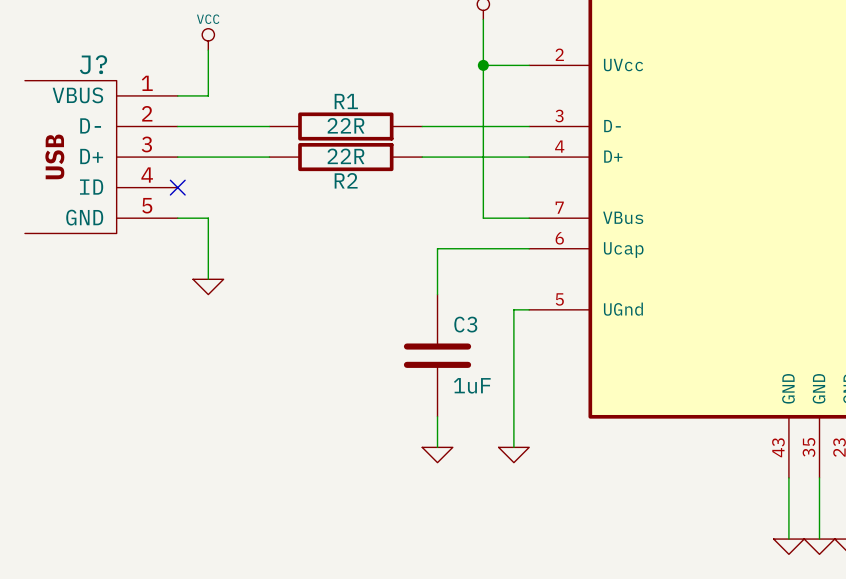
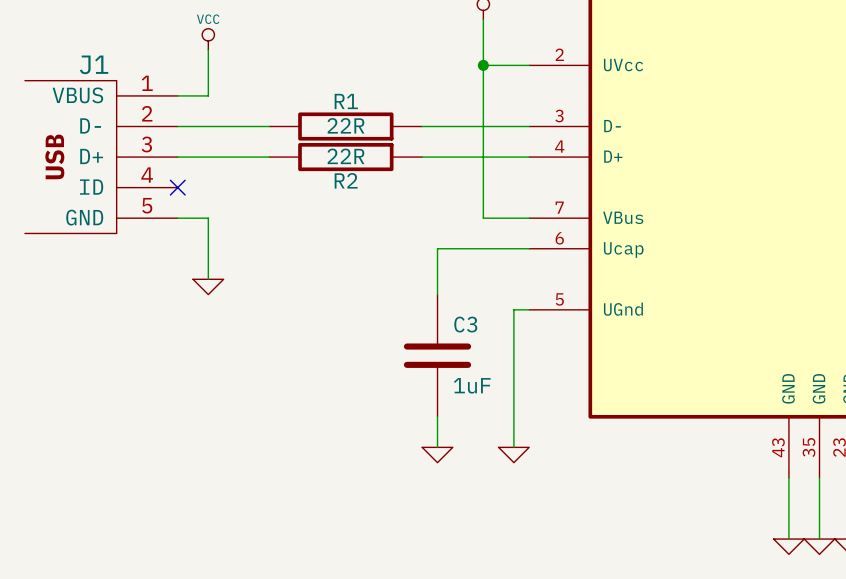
J? name: J? (93, 64) -> J1 (94, 64)

